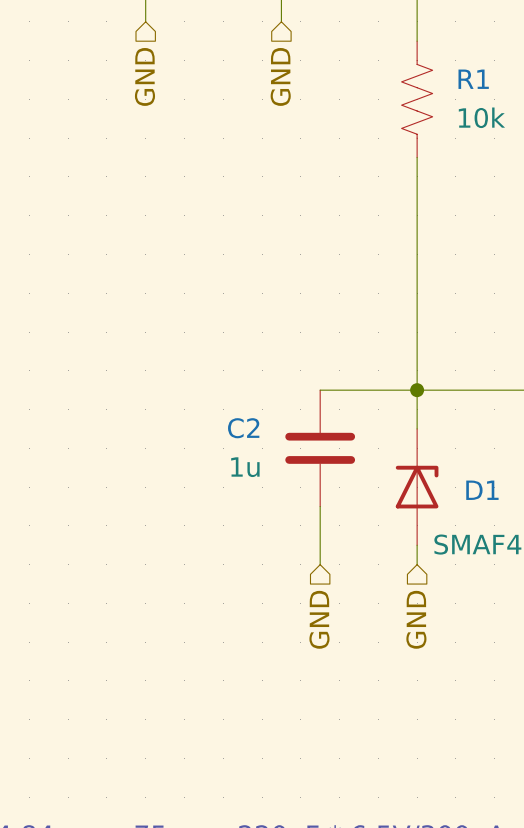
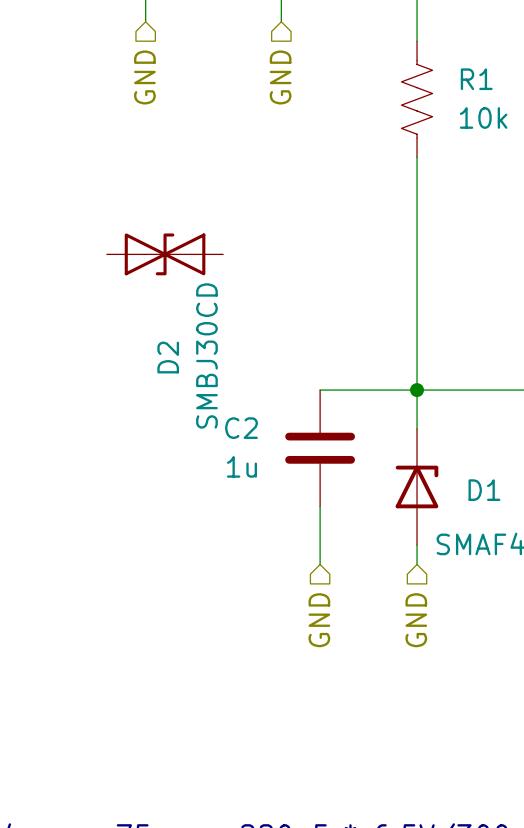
D2: none -> SMBJ30CD (165, 254)

